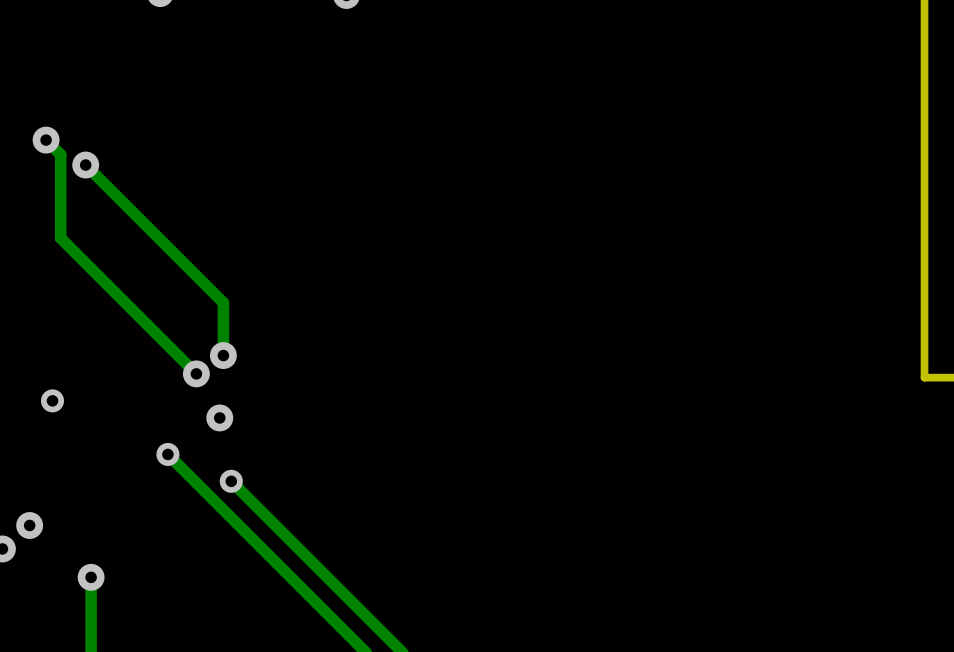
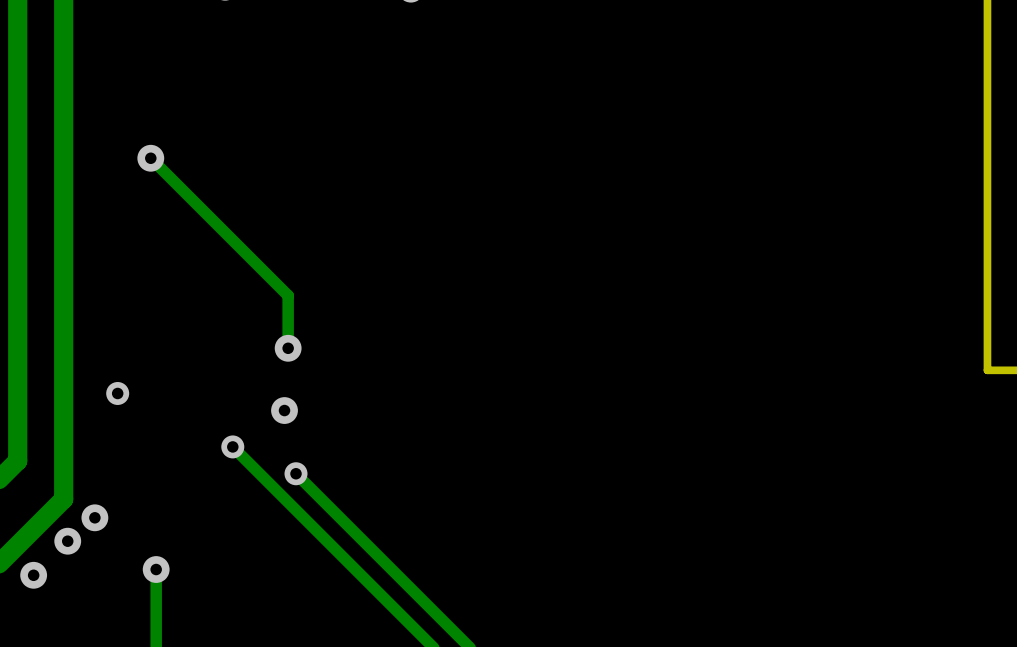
track: (46, 140) (60, 154) (60, 238) (196, 373) -> none
via: (46, 140) -> none
via: (196, 373) -> none

